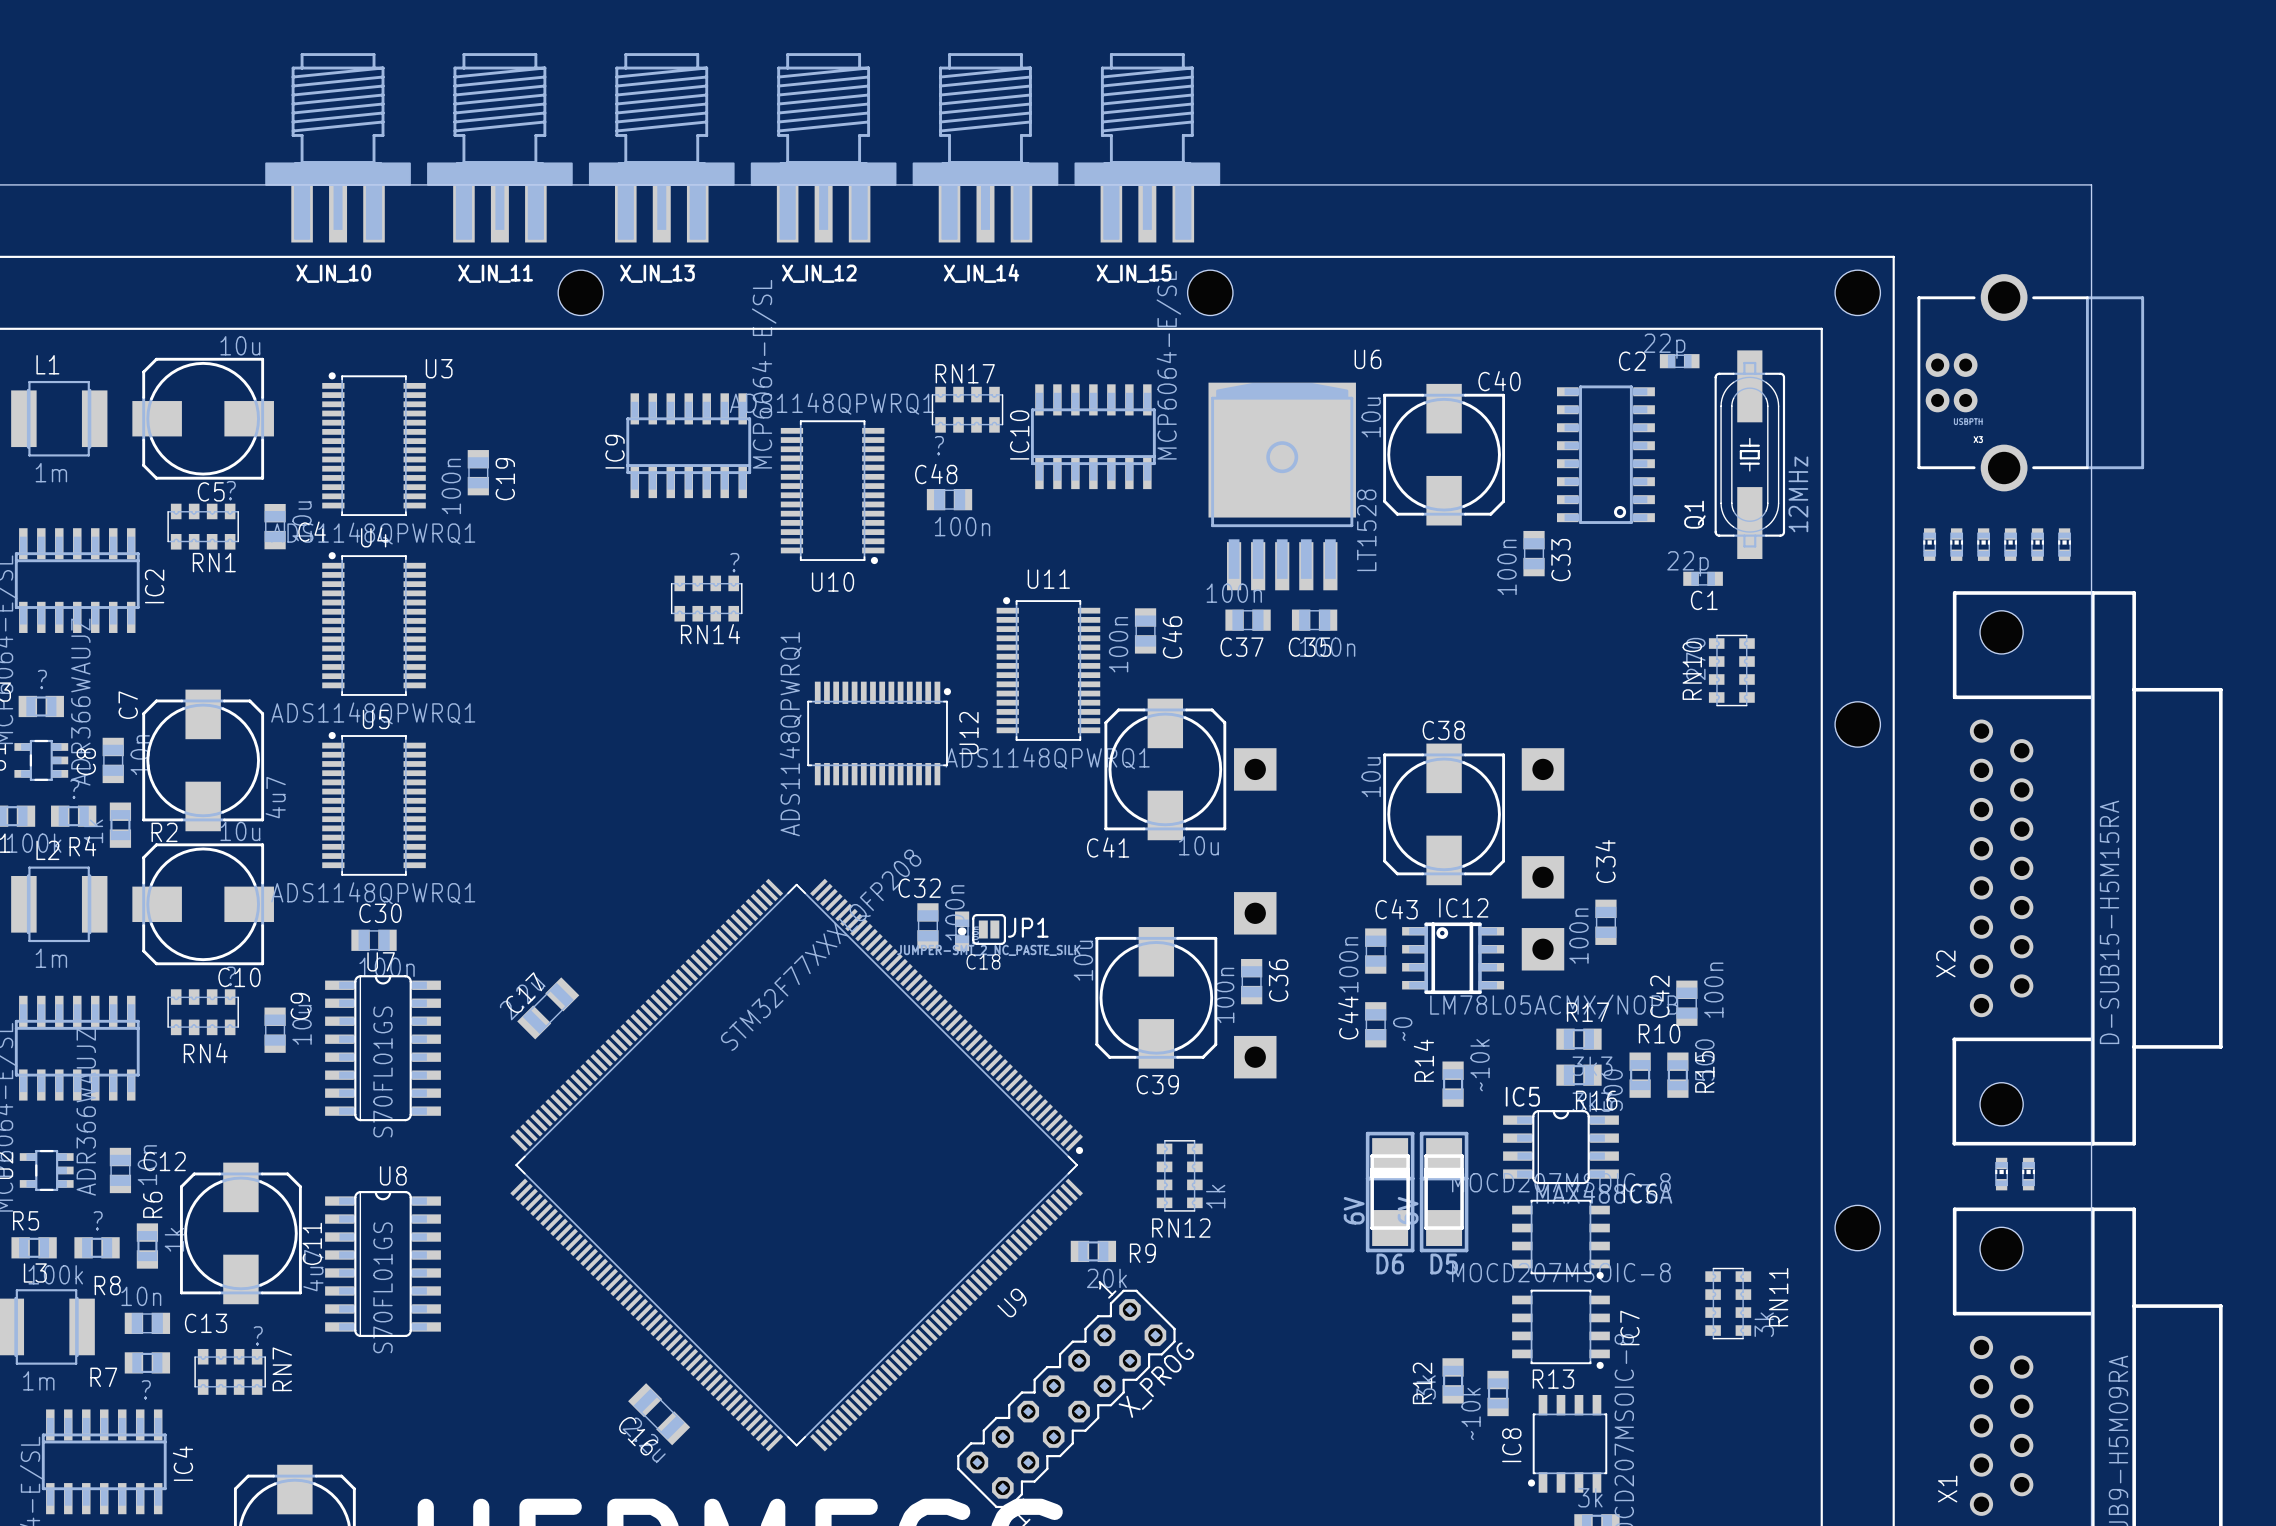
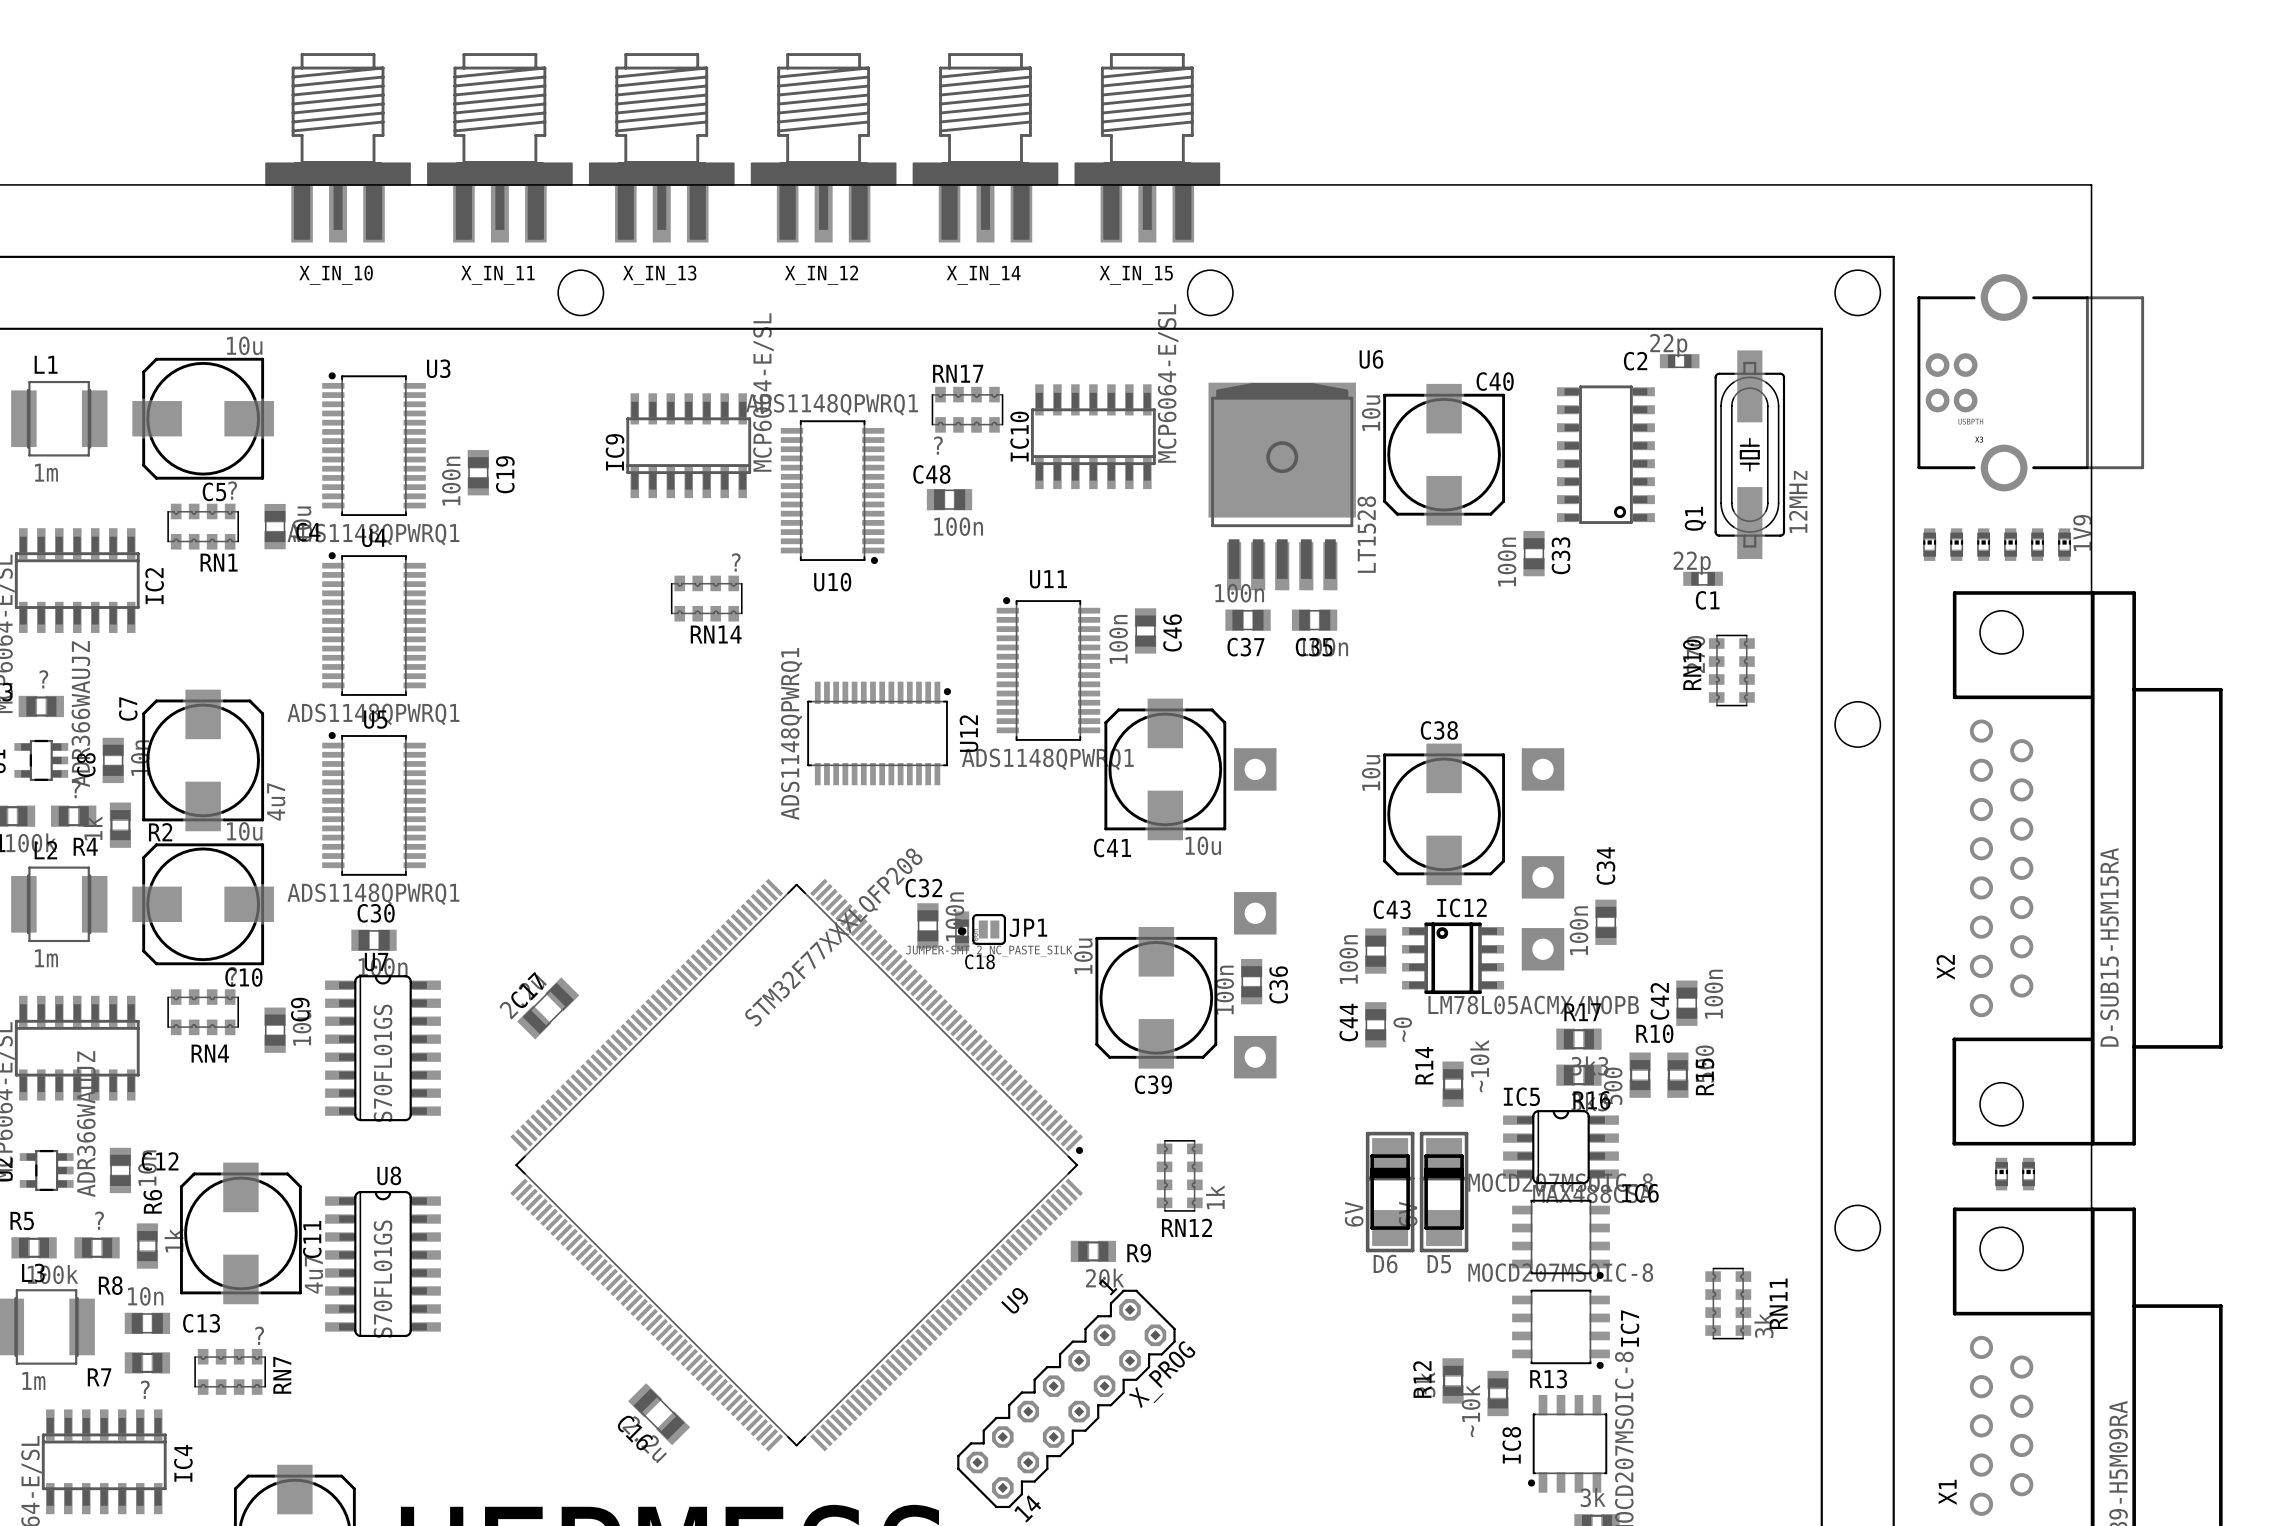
part value: none -> 1V9 (2082, 532)

